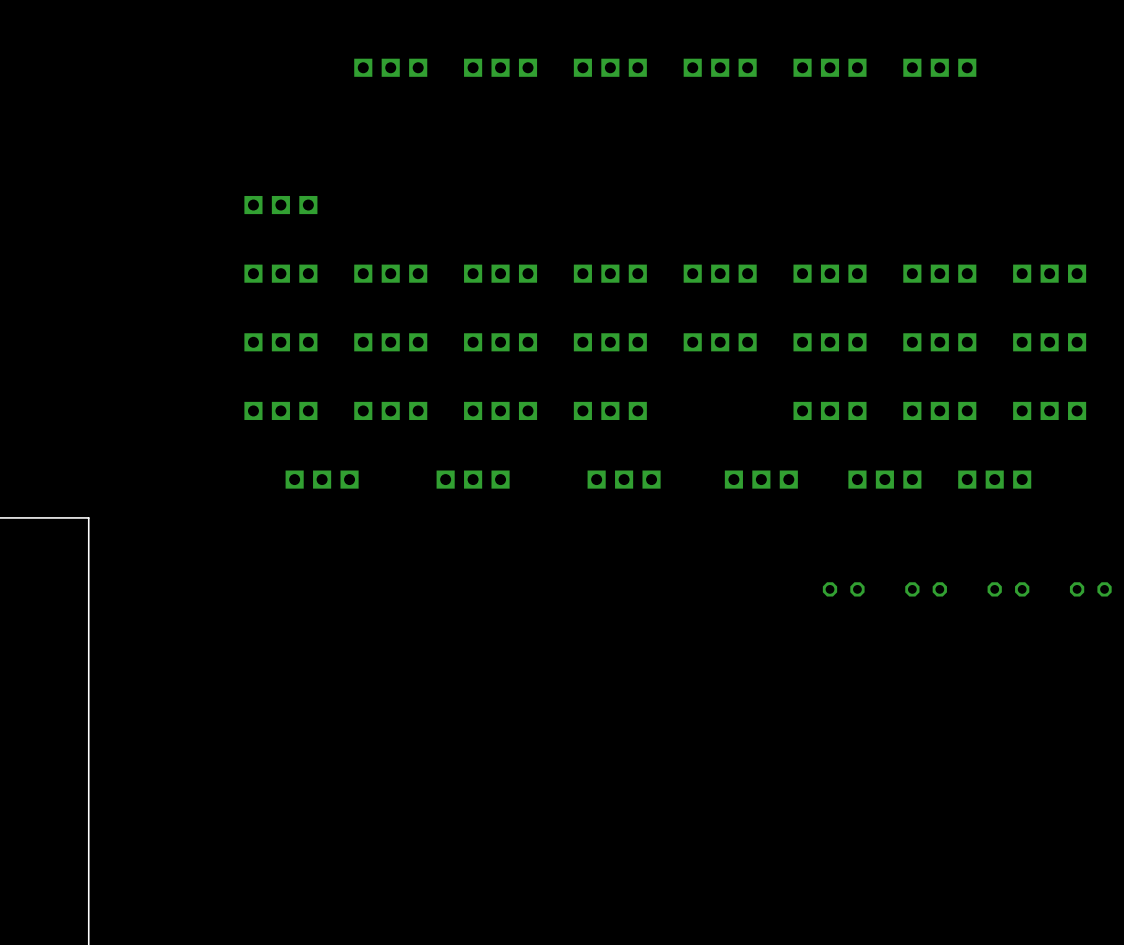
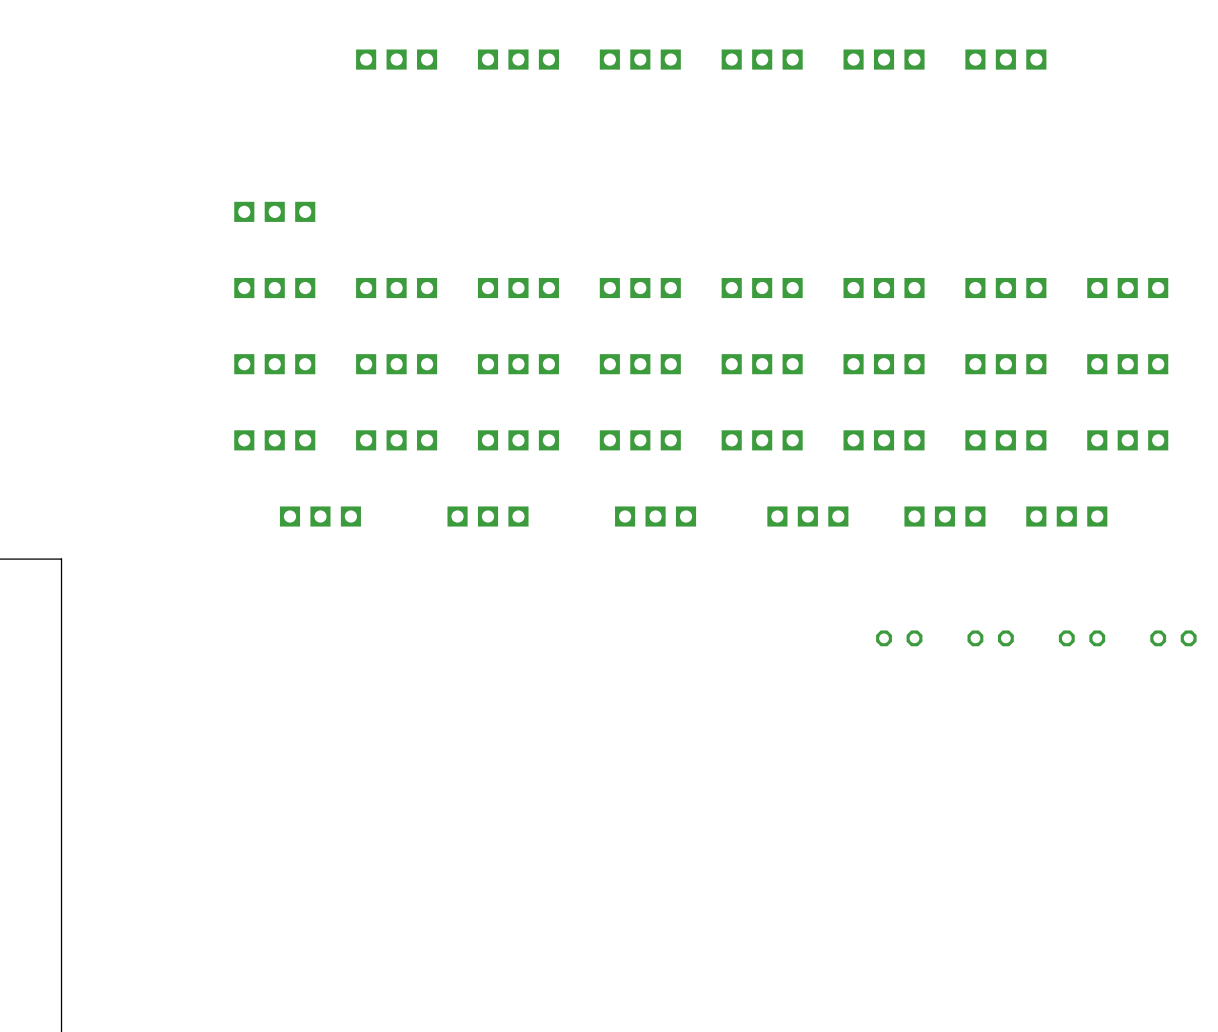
part: none -> (762, 440)

